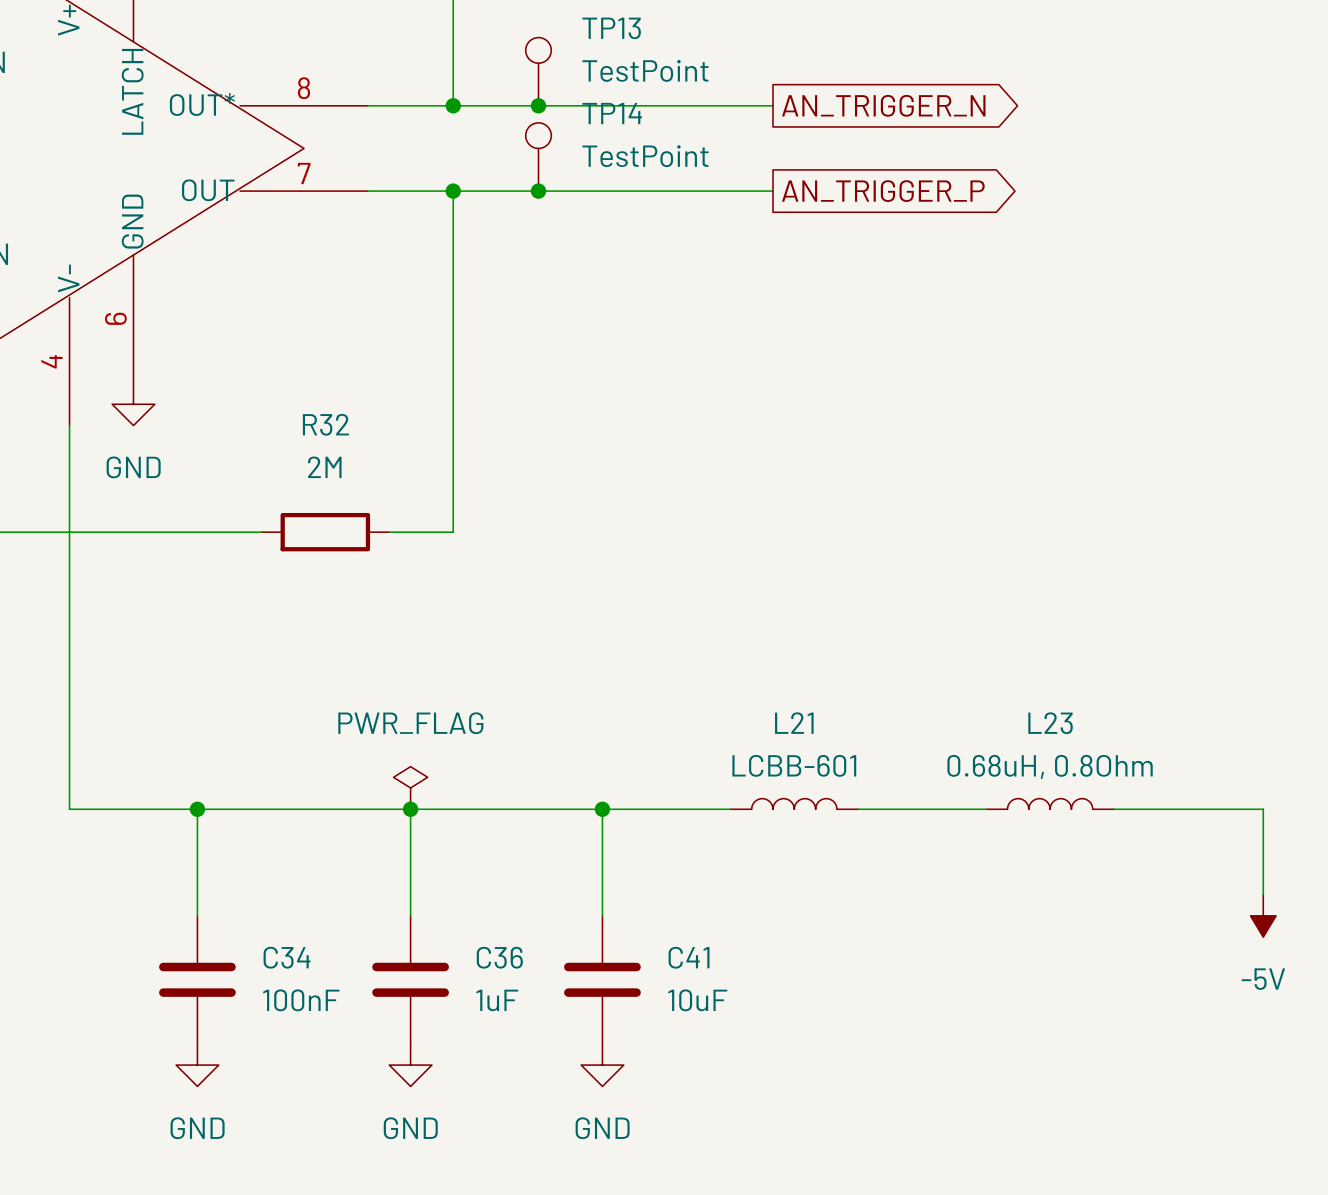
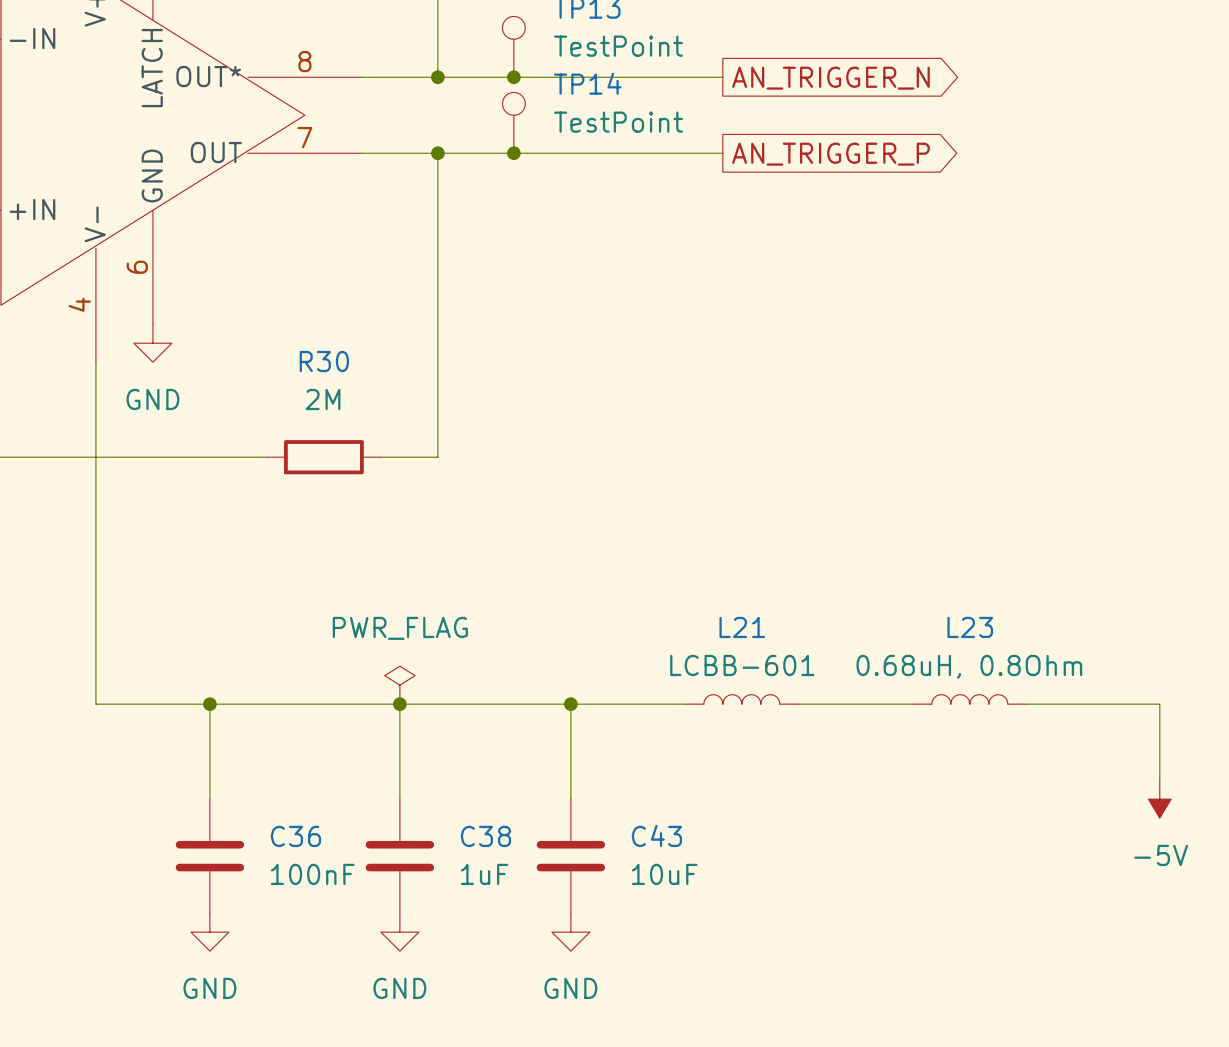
R32 name: R32 (325, 424) -> R30 (324, 361)
C34 name: C34 (287, 957) -> C36 (296, 836)
C36 name: C36 (499, 957) -> C38 (485, 836)
C41 name: C41 (689, 957) -> C43 (656, 835)

